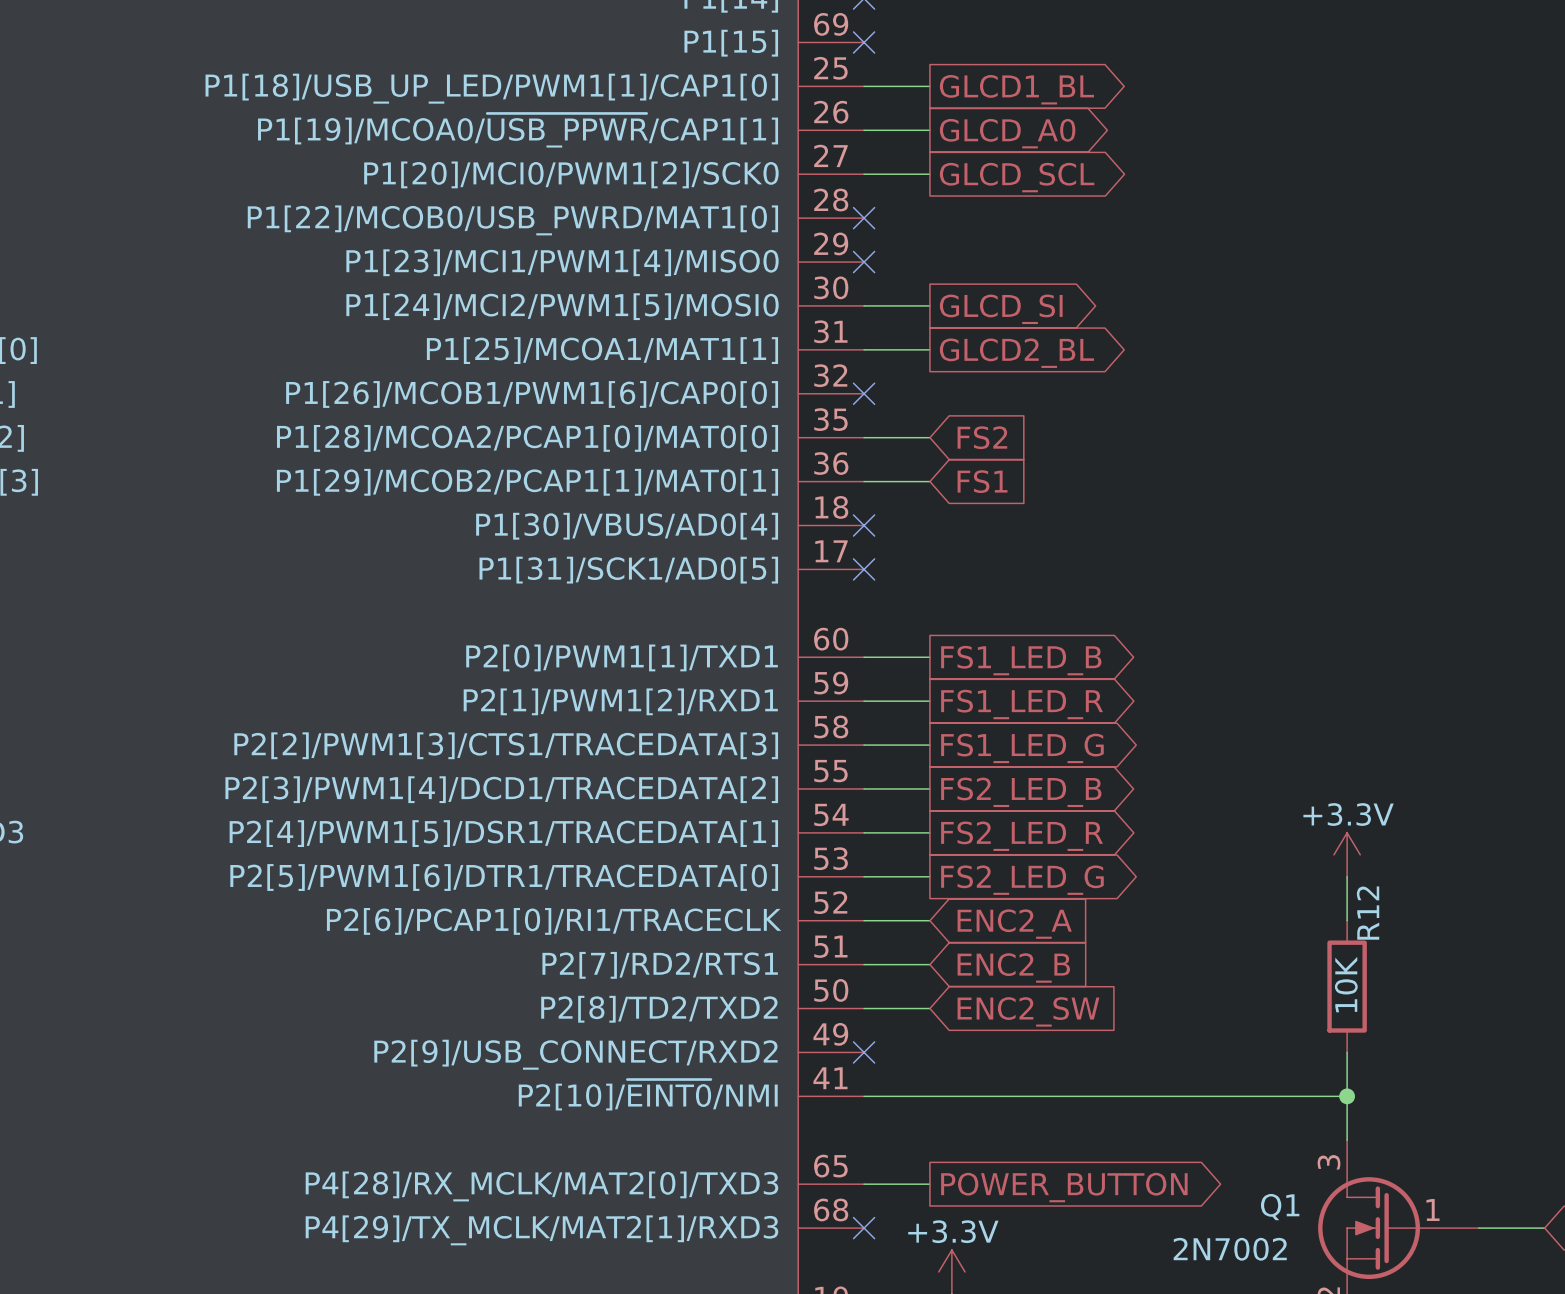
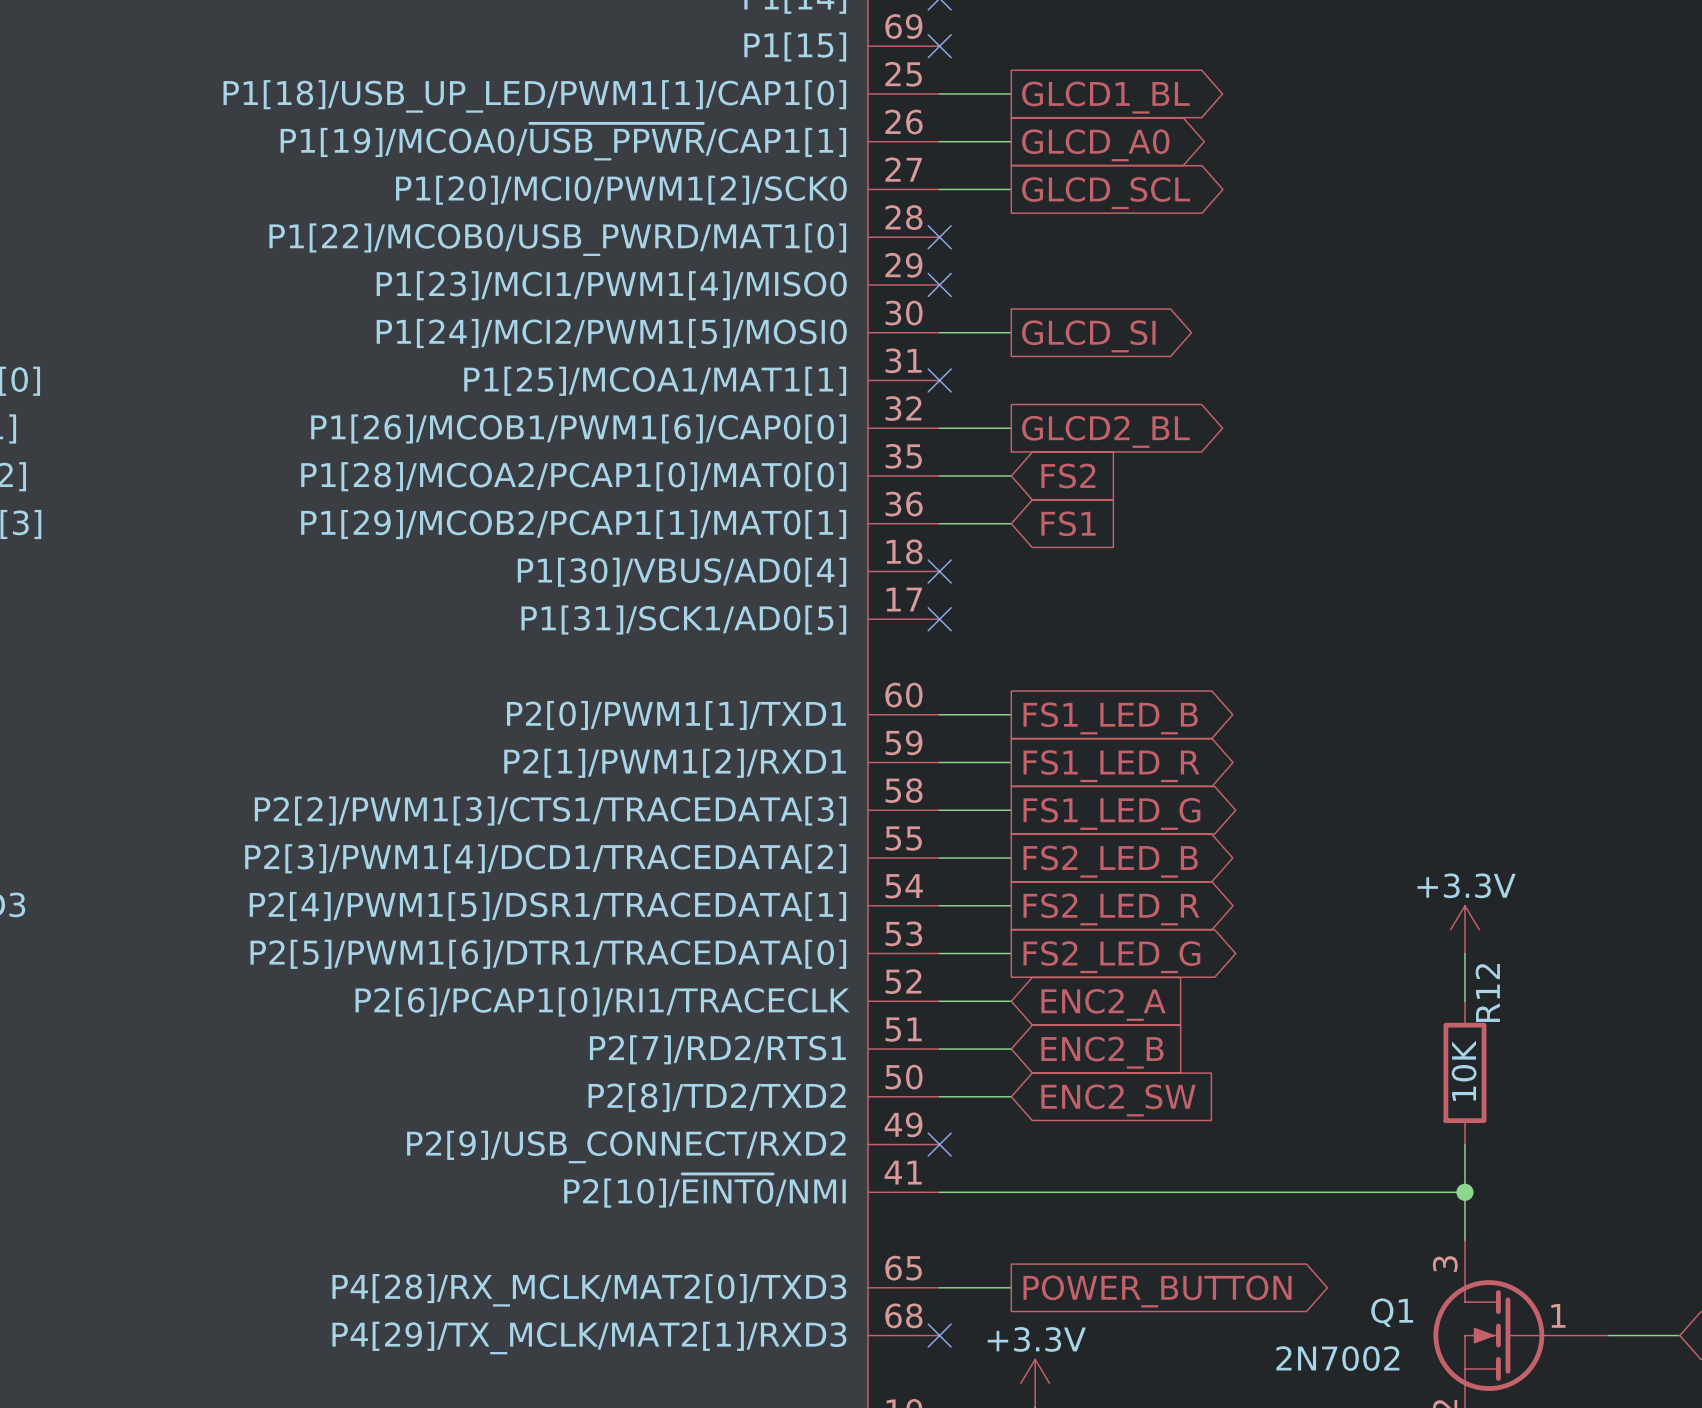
wire: (864, 349) (929, 349) -> (939, 428) (1011, 428)
global label position: GLCD2_BL (1016, 353) -> GLCD2_BL (1105, 431)
no-connect mark position: (864, 393) -> (939, 380)

